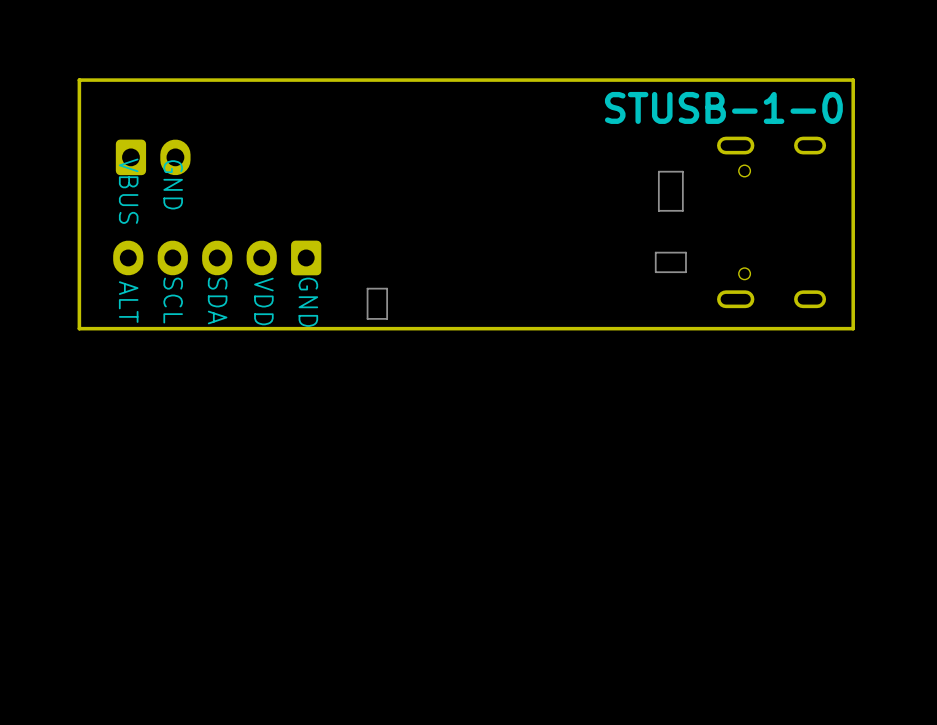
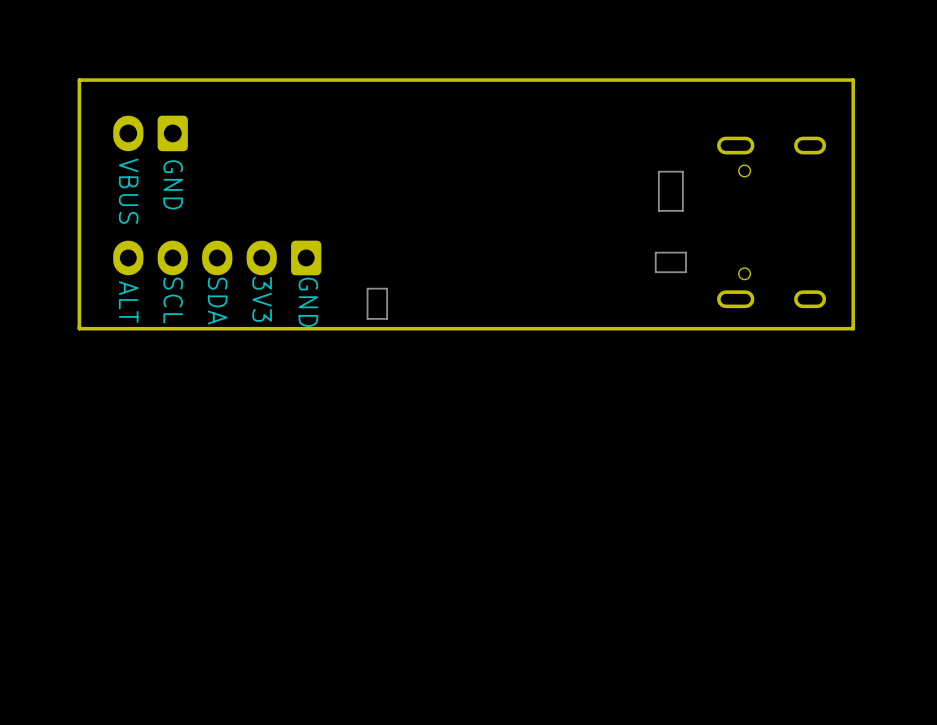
text: STUSB-1-0 (723, 107) -> none
part rotation: 0° (153, 157) -> 180° (150, 133)
text: VDD (263, 301) -> 3V3 (262, 299)

